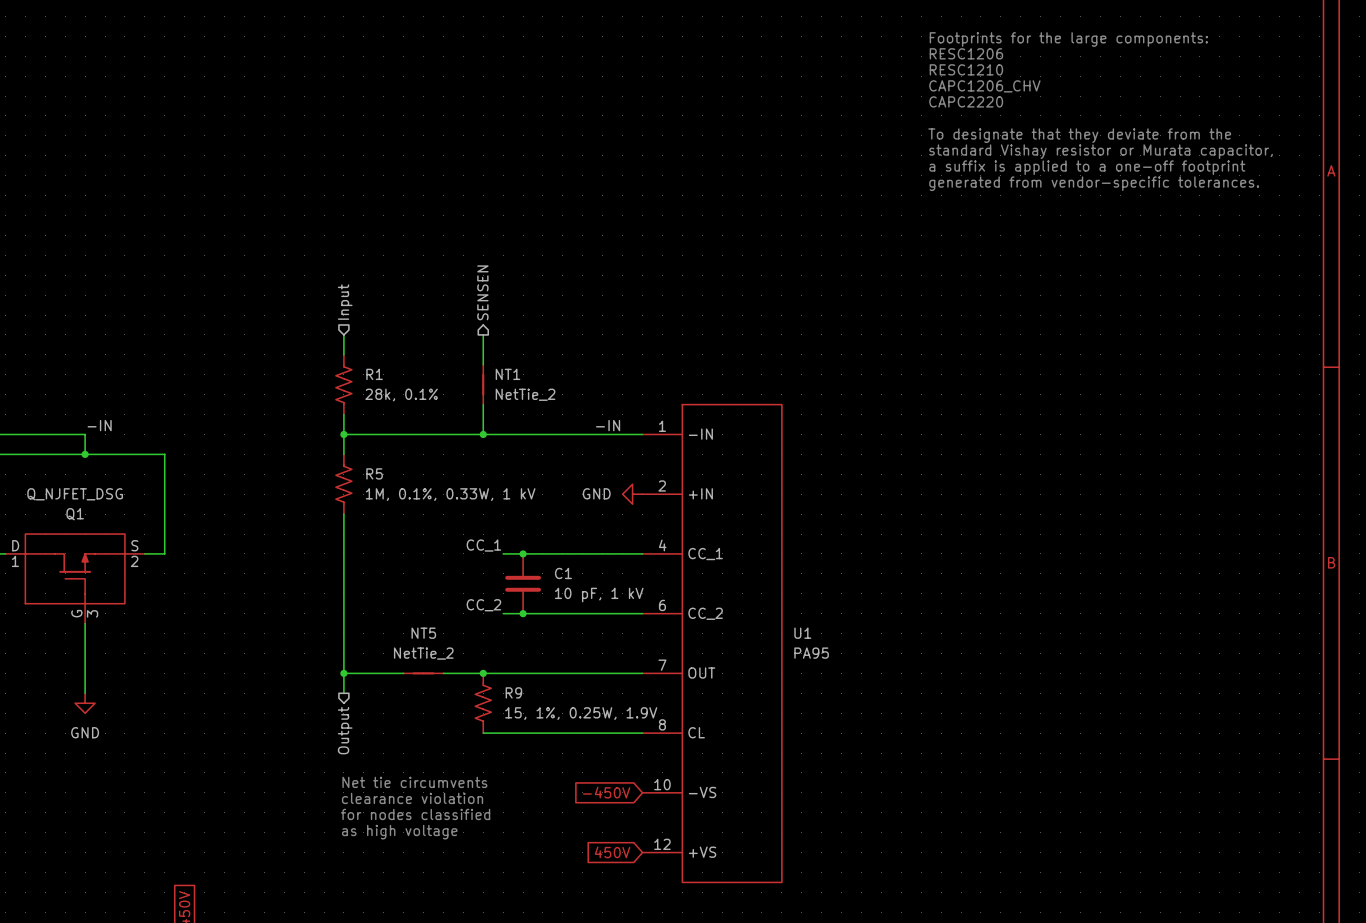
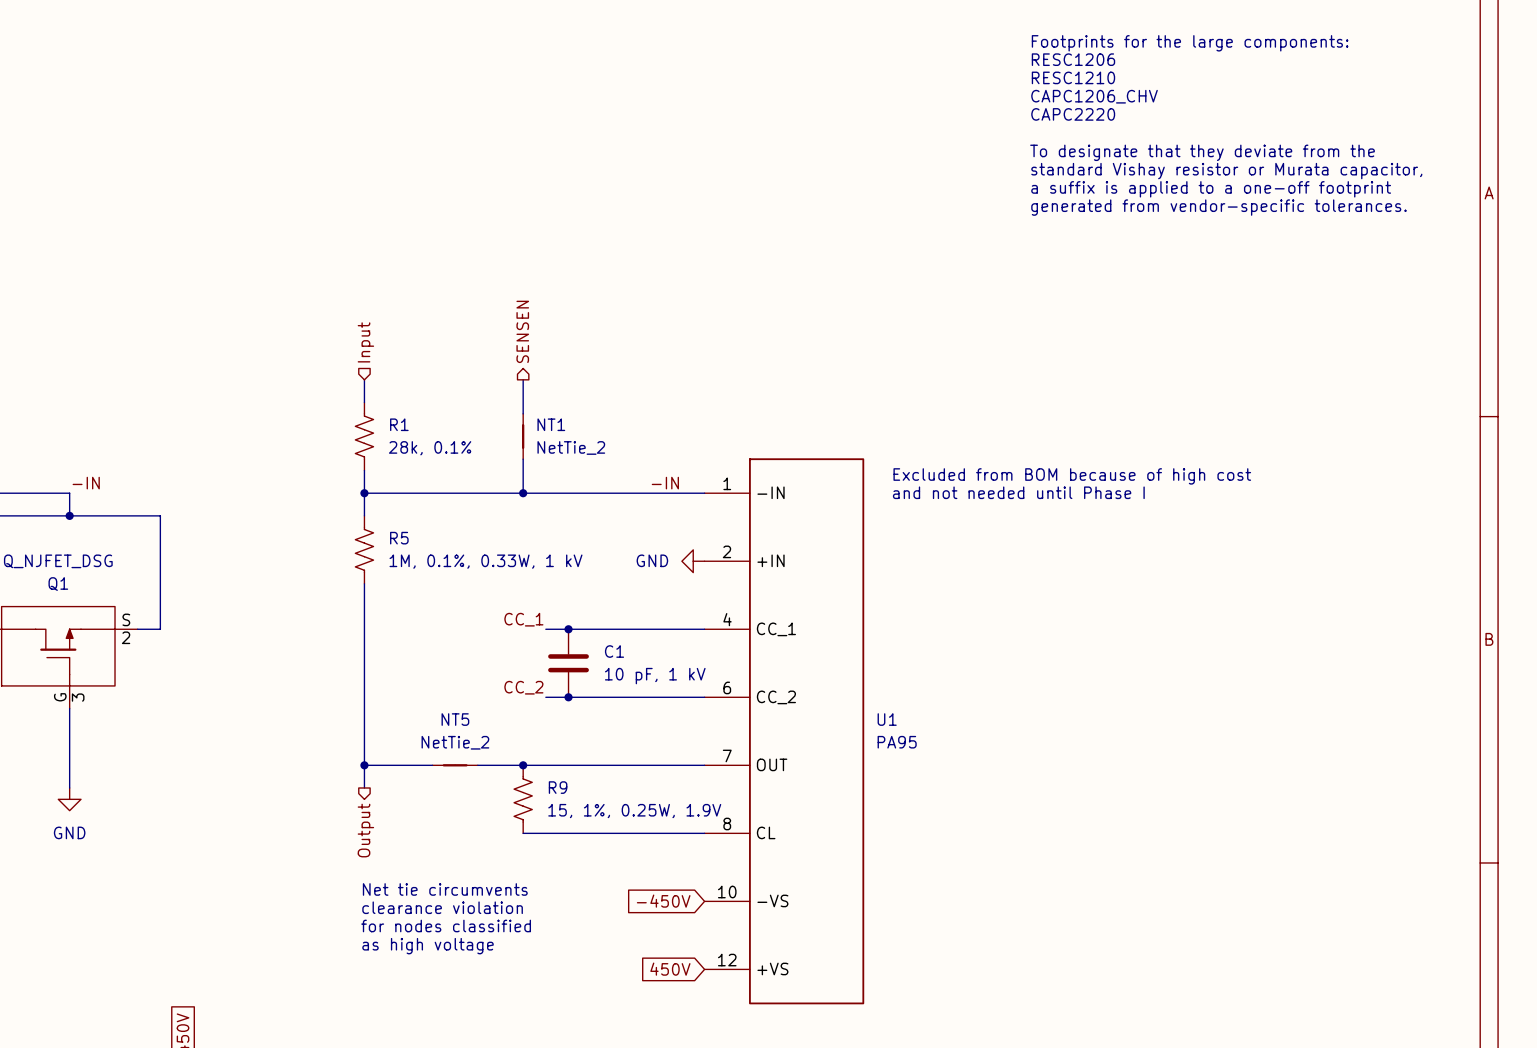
text: none -> Excluded from BOM because of high cost (1072, 476)
text: none -> and not needed until Phase I (1018, 492)

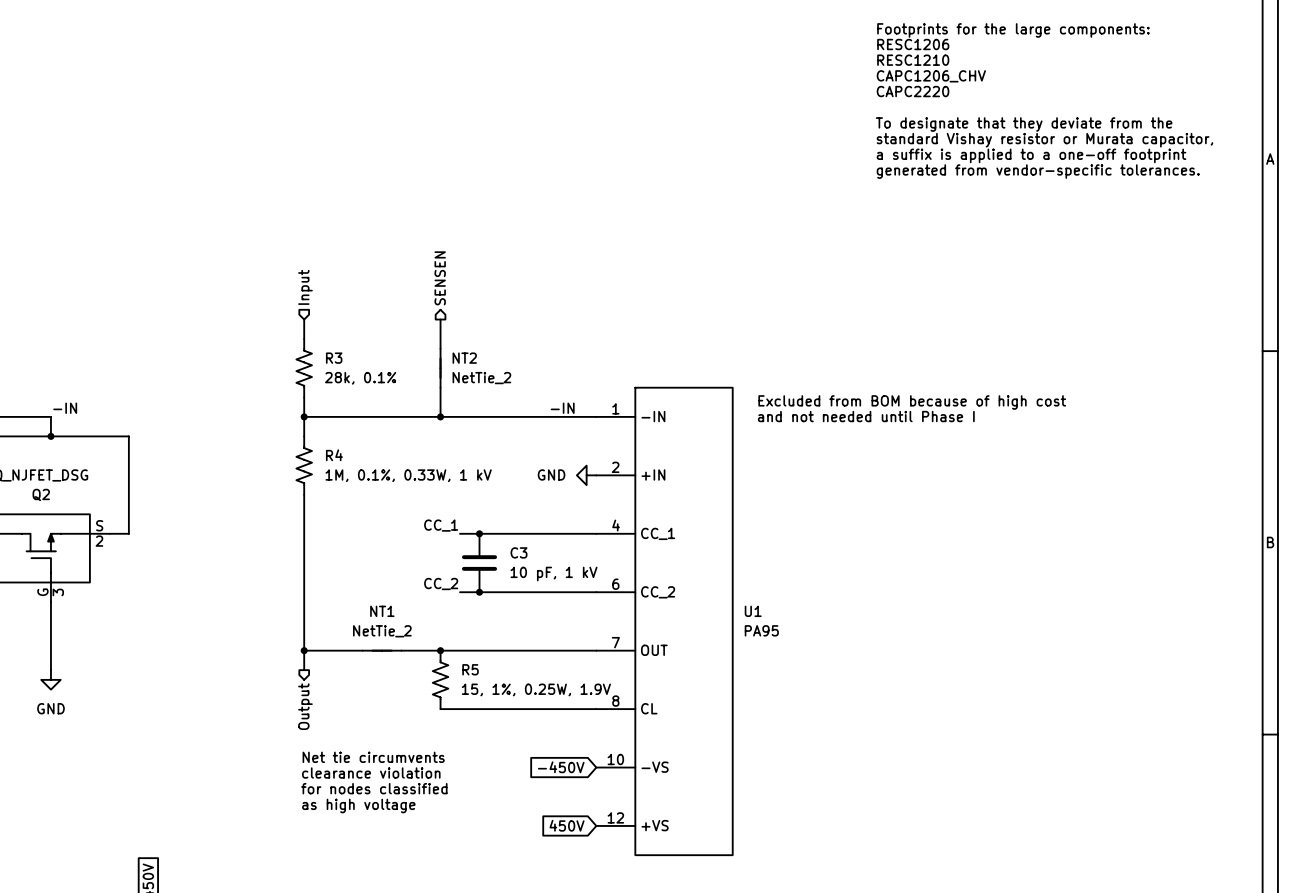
R1 name: R1 (399, 424) -> R3 (334, 358)
NT1 name: NT1 (551, 424) -> NT2 (464, 358)
R5 name: R5 (399, 538) -> R4 (334, 455)
Q1 name: Q1 (58, 584) -> Q2 (41, 494)
C1 name: C1 (614, 651) -> C3 (518, 552)
NT5 name: NT5 (455, 719) -> NT1 (382, 611)
R9 name: R9 (558, 787) -> R5 (470, 669)

